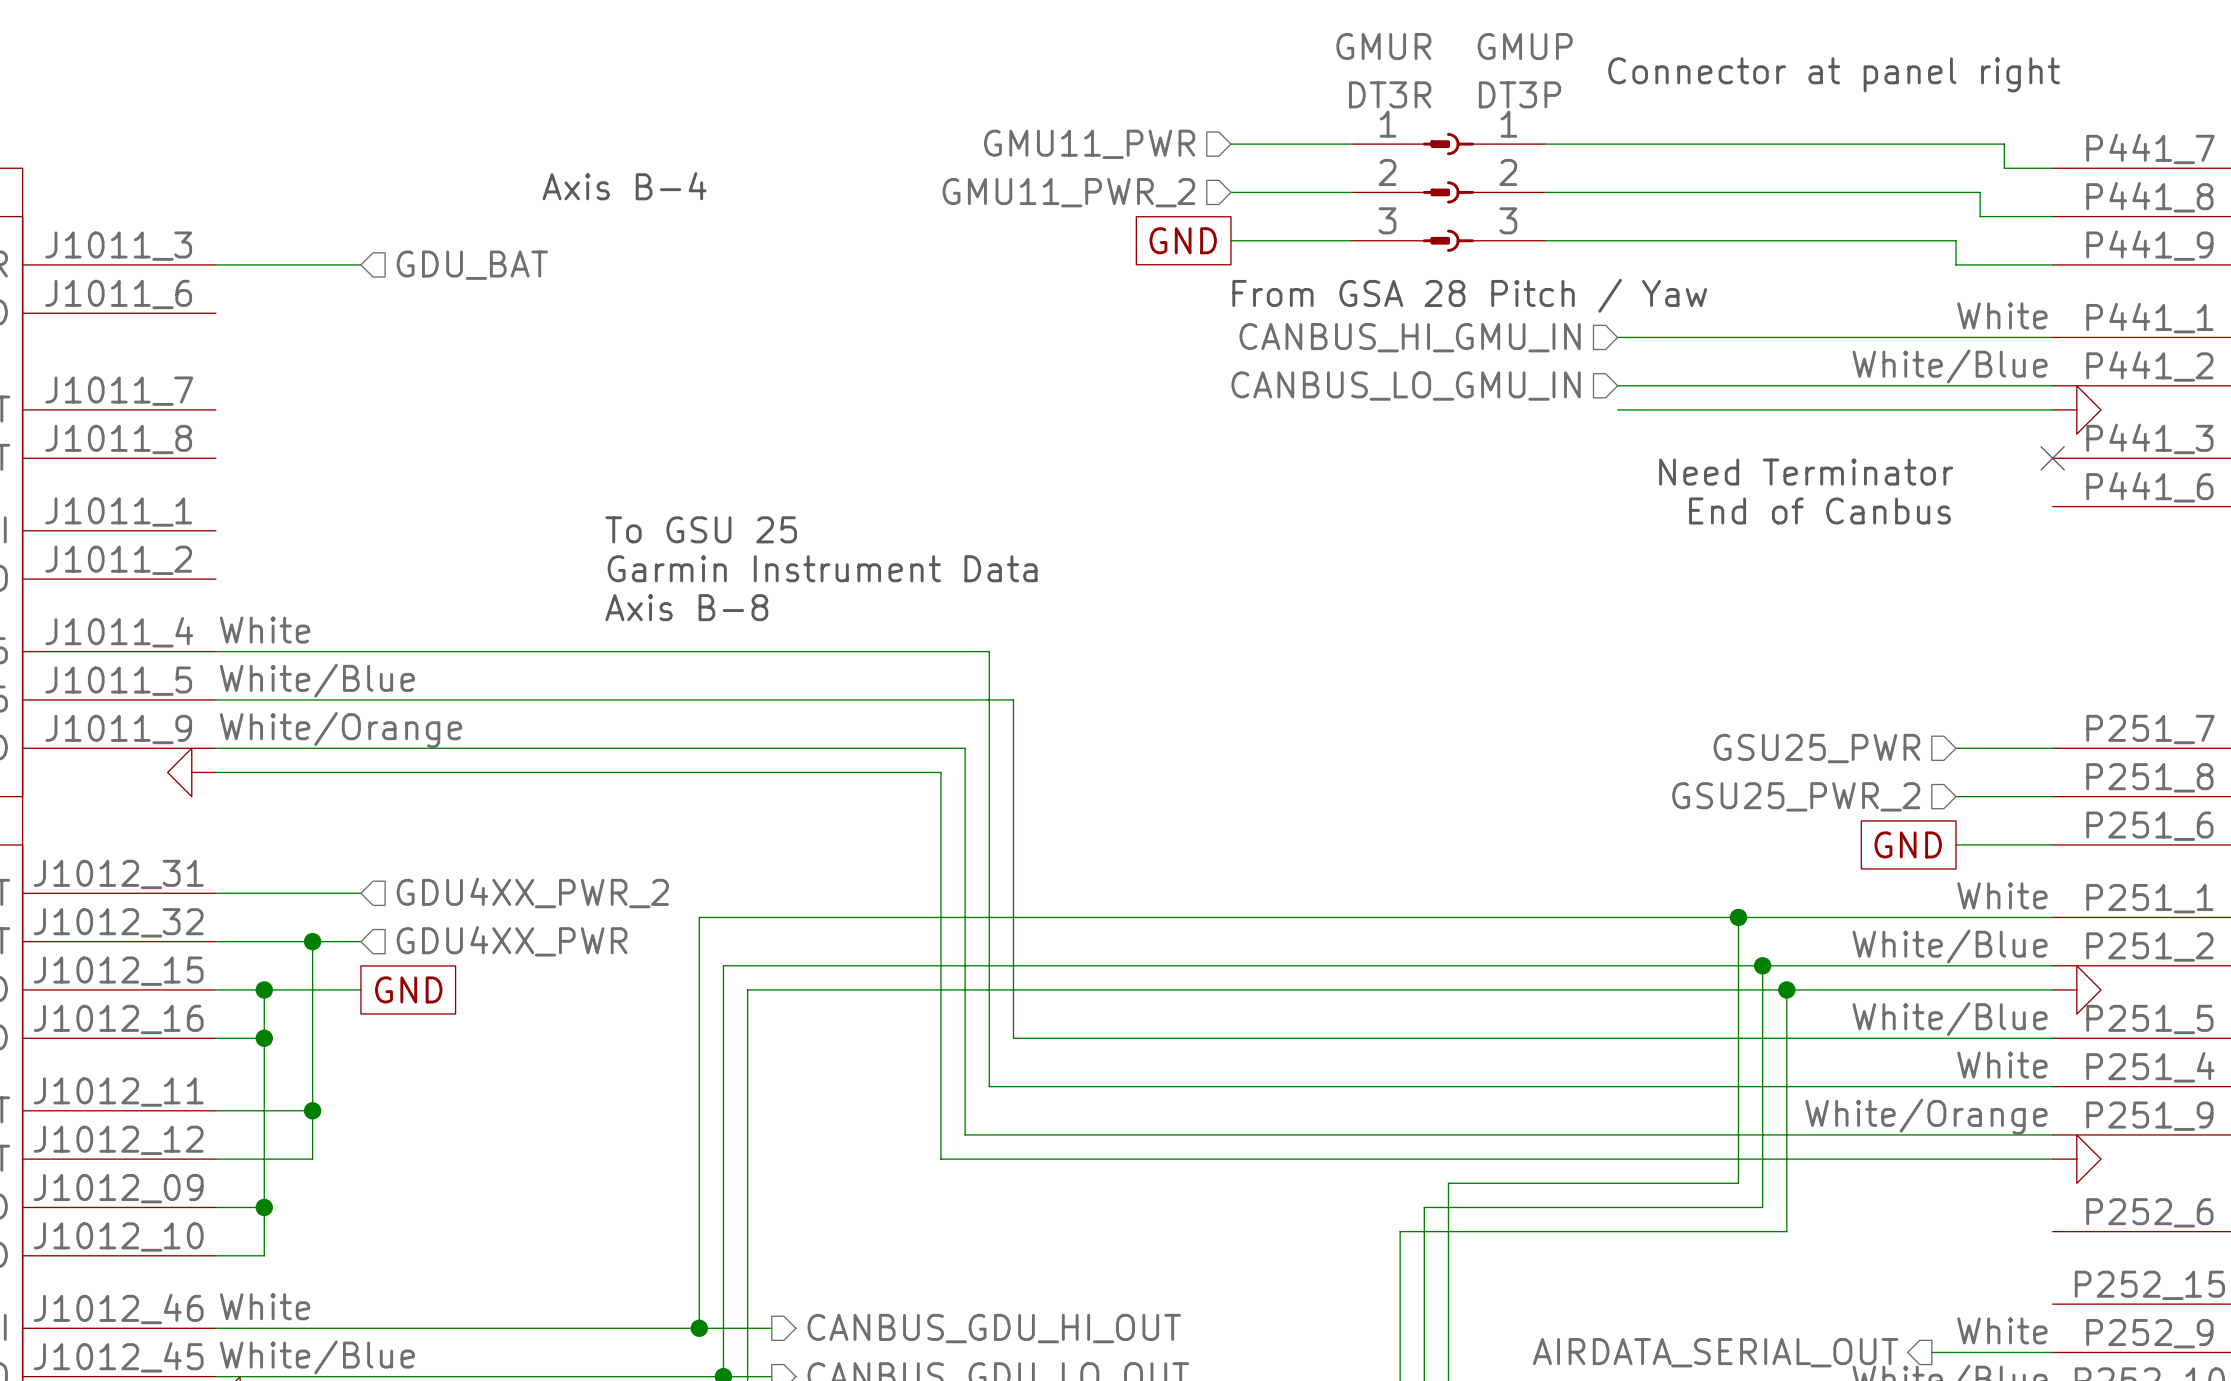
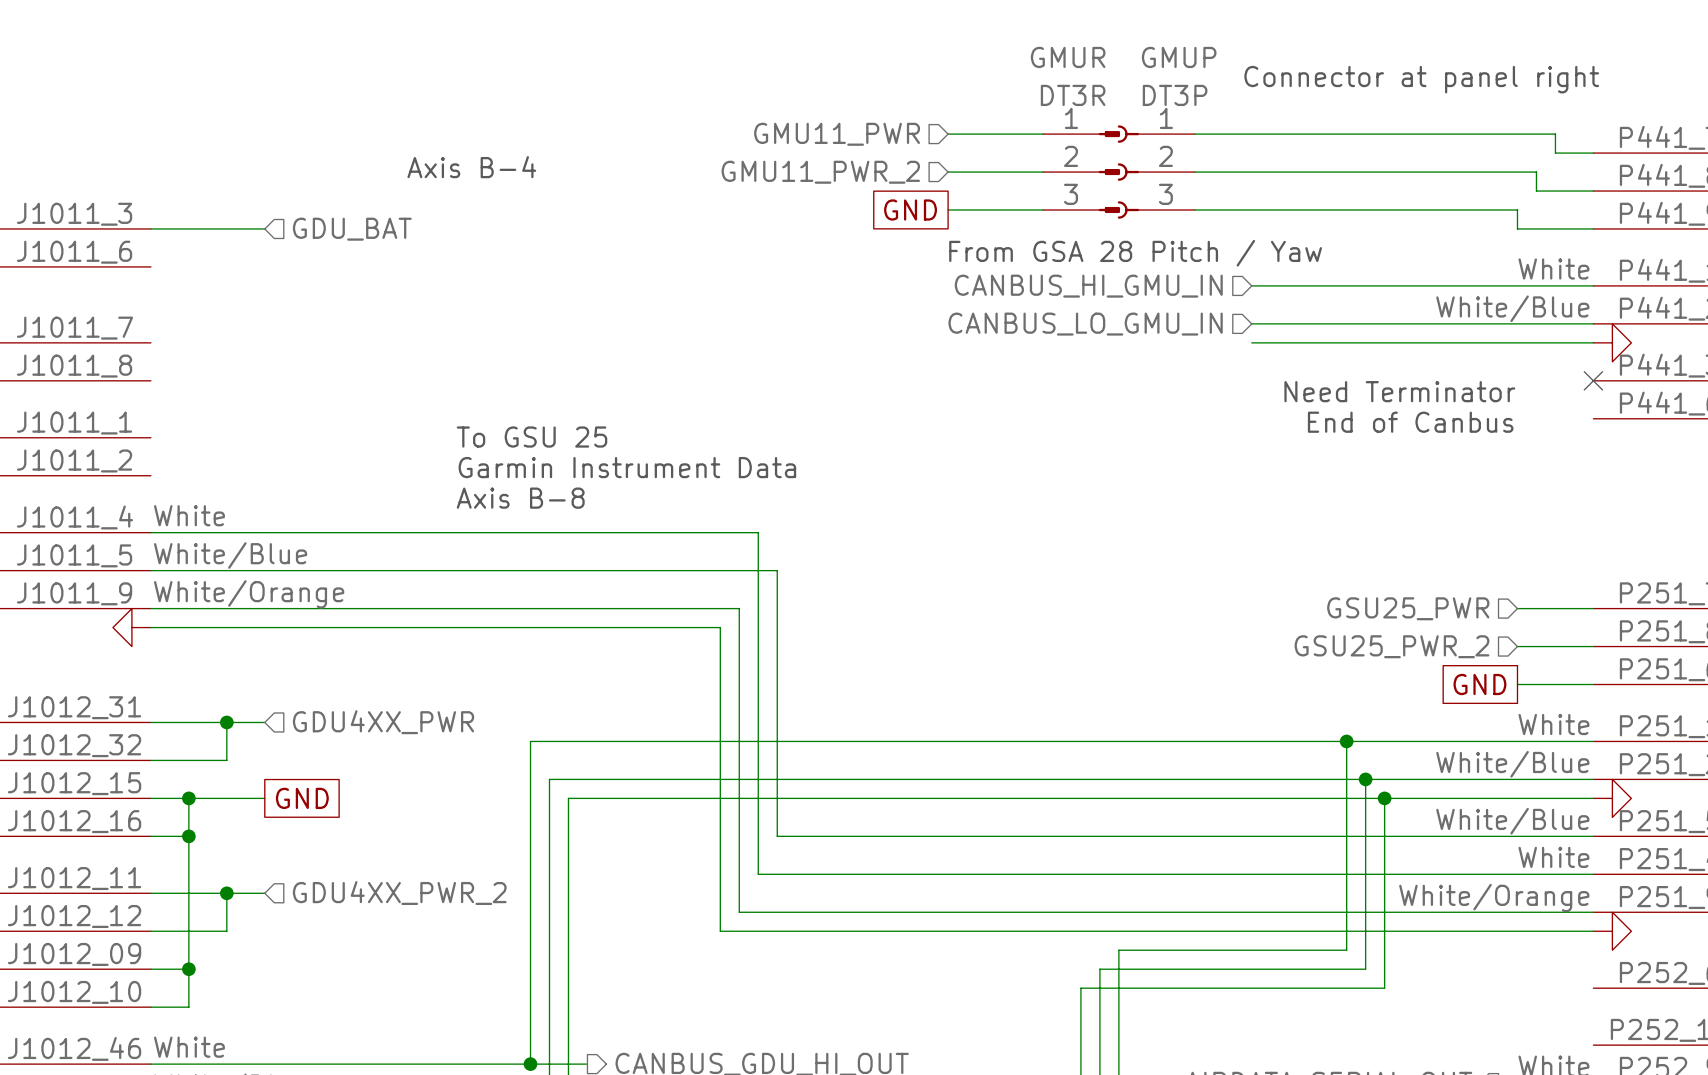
hierarchical label: GDU4XX_PWR_2 (532, 892) -> GDU4XX_PWR (383, 722)
wire: none -> (226, 722) (226, 760)
junction position: (312, 941) -> (226, 722)
wire: (360, 941) (312, 941) (312, 1110) -> (264, 893) (226, 893)
hierarchical label: GDU4XX_PWR (512, 941) -> none
hierarchical label: none -> GDU4XX_PWR_2 (399, 893)

